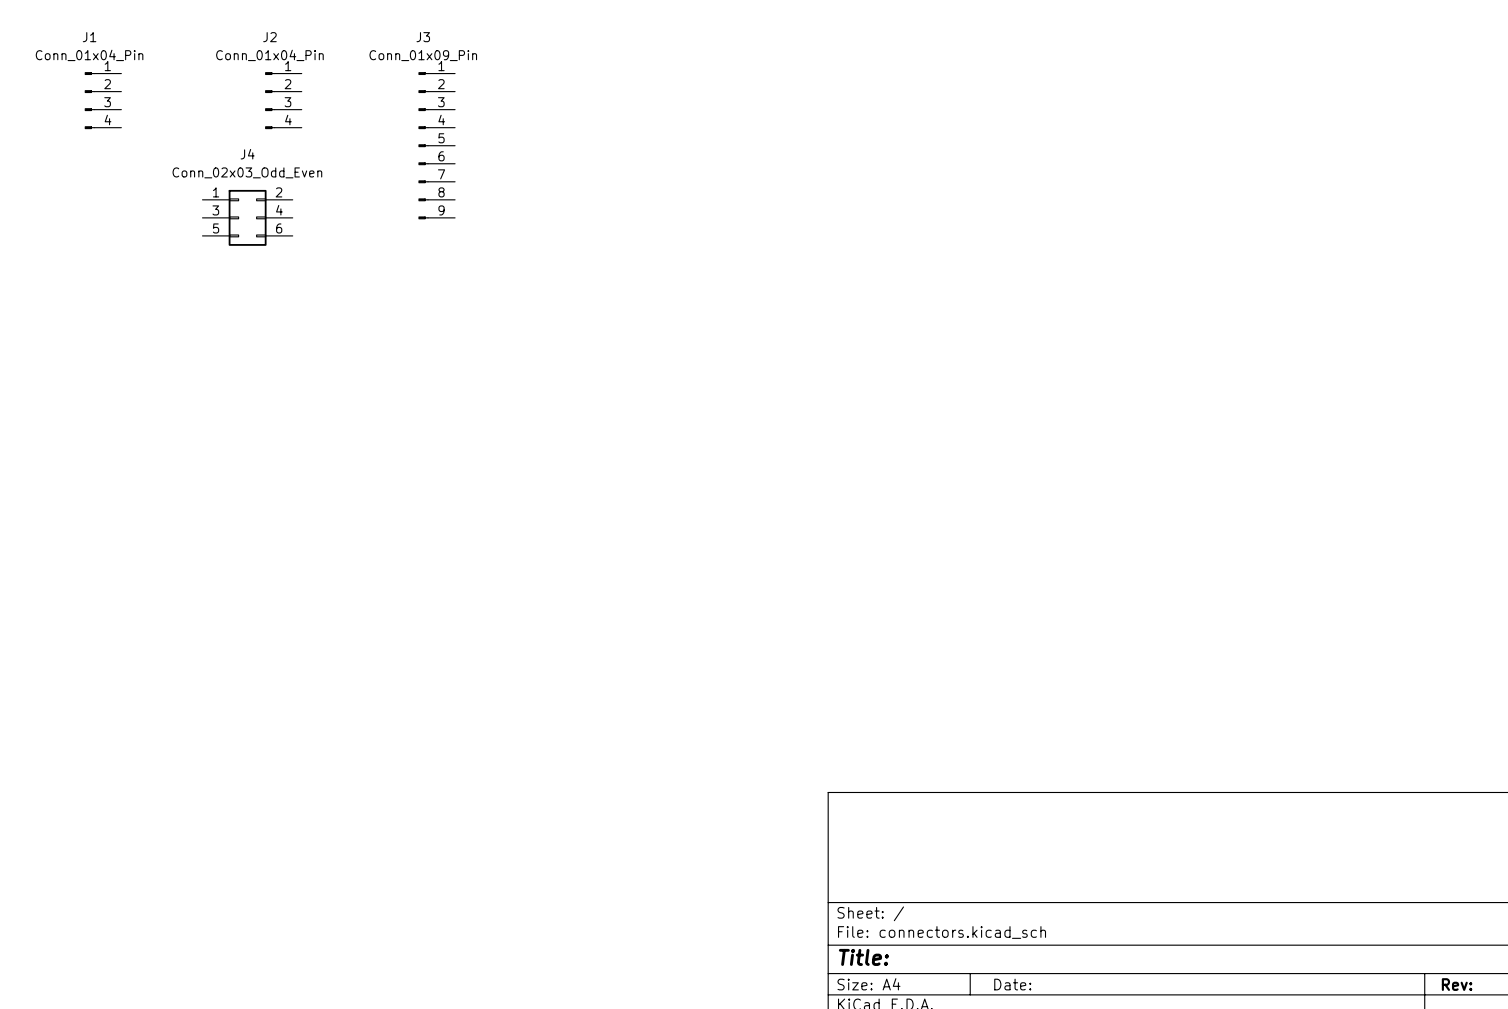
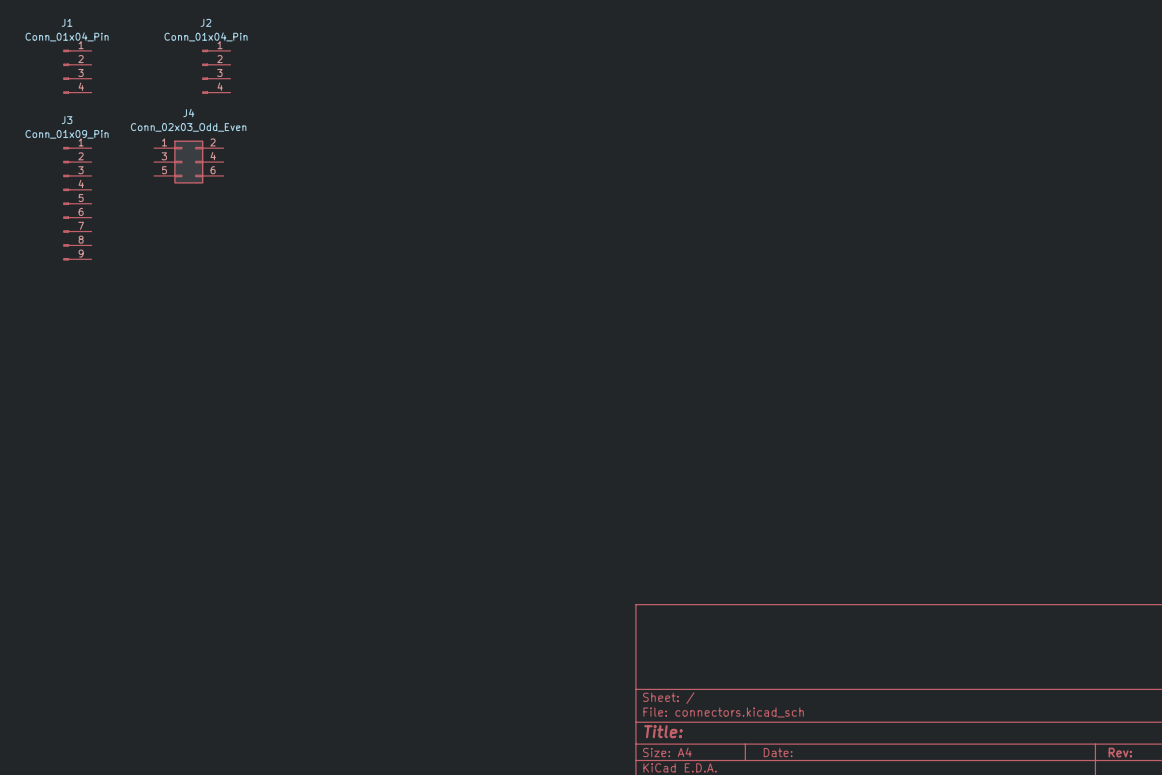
J3 position: (436, 145) -> (77, 203)

